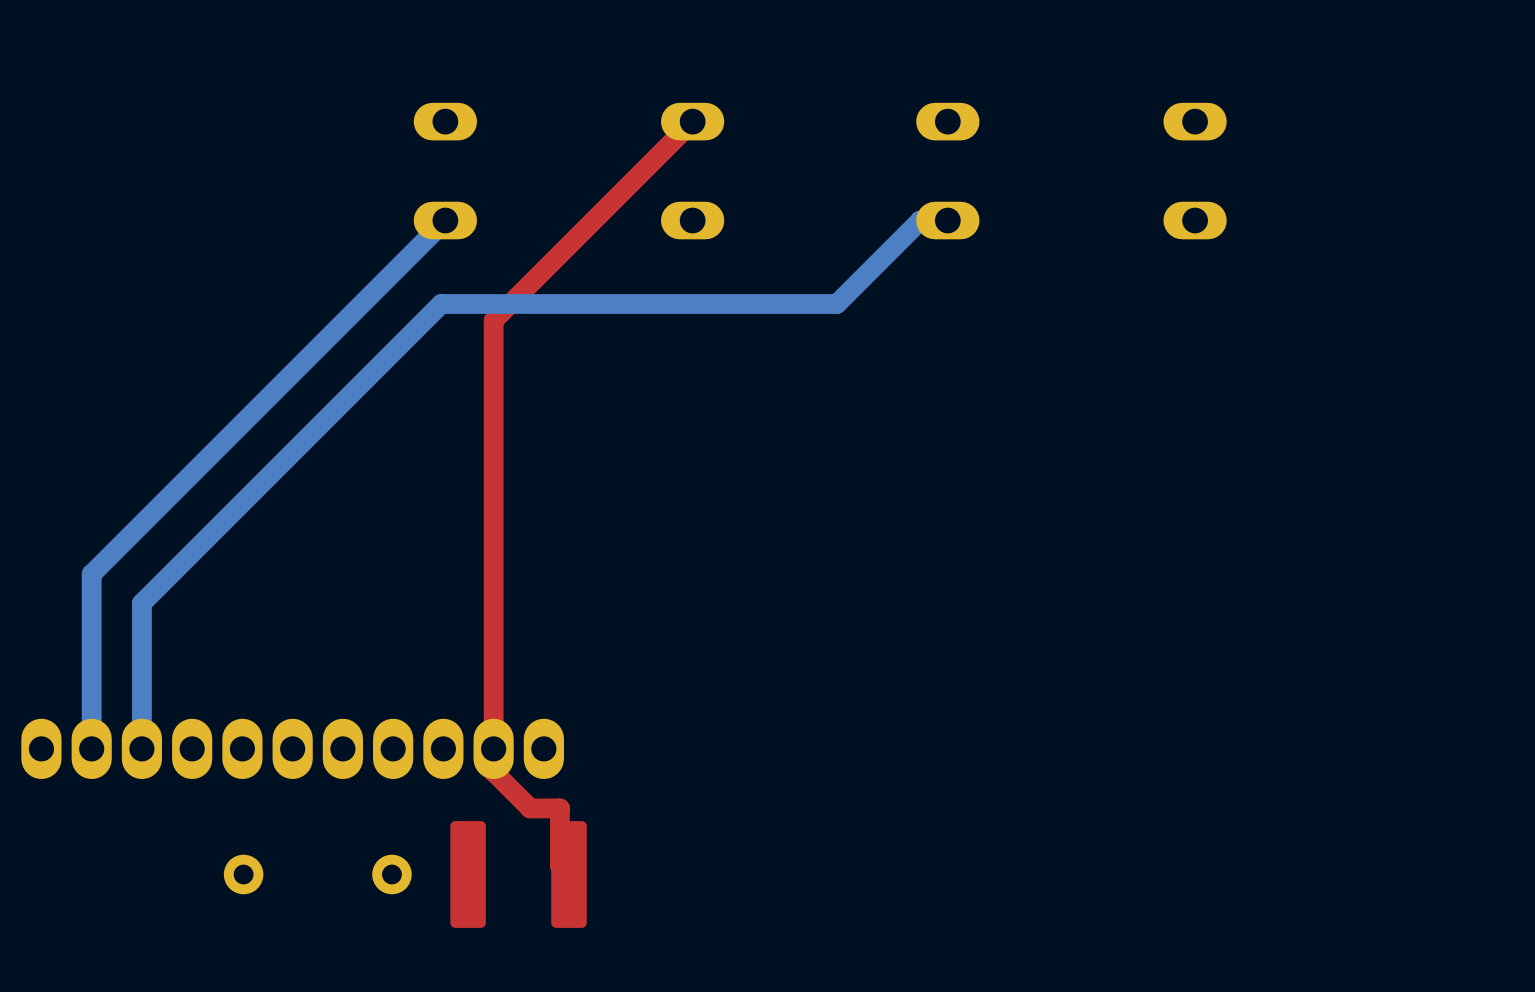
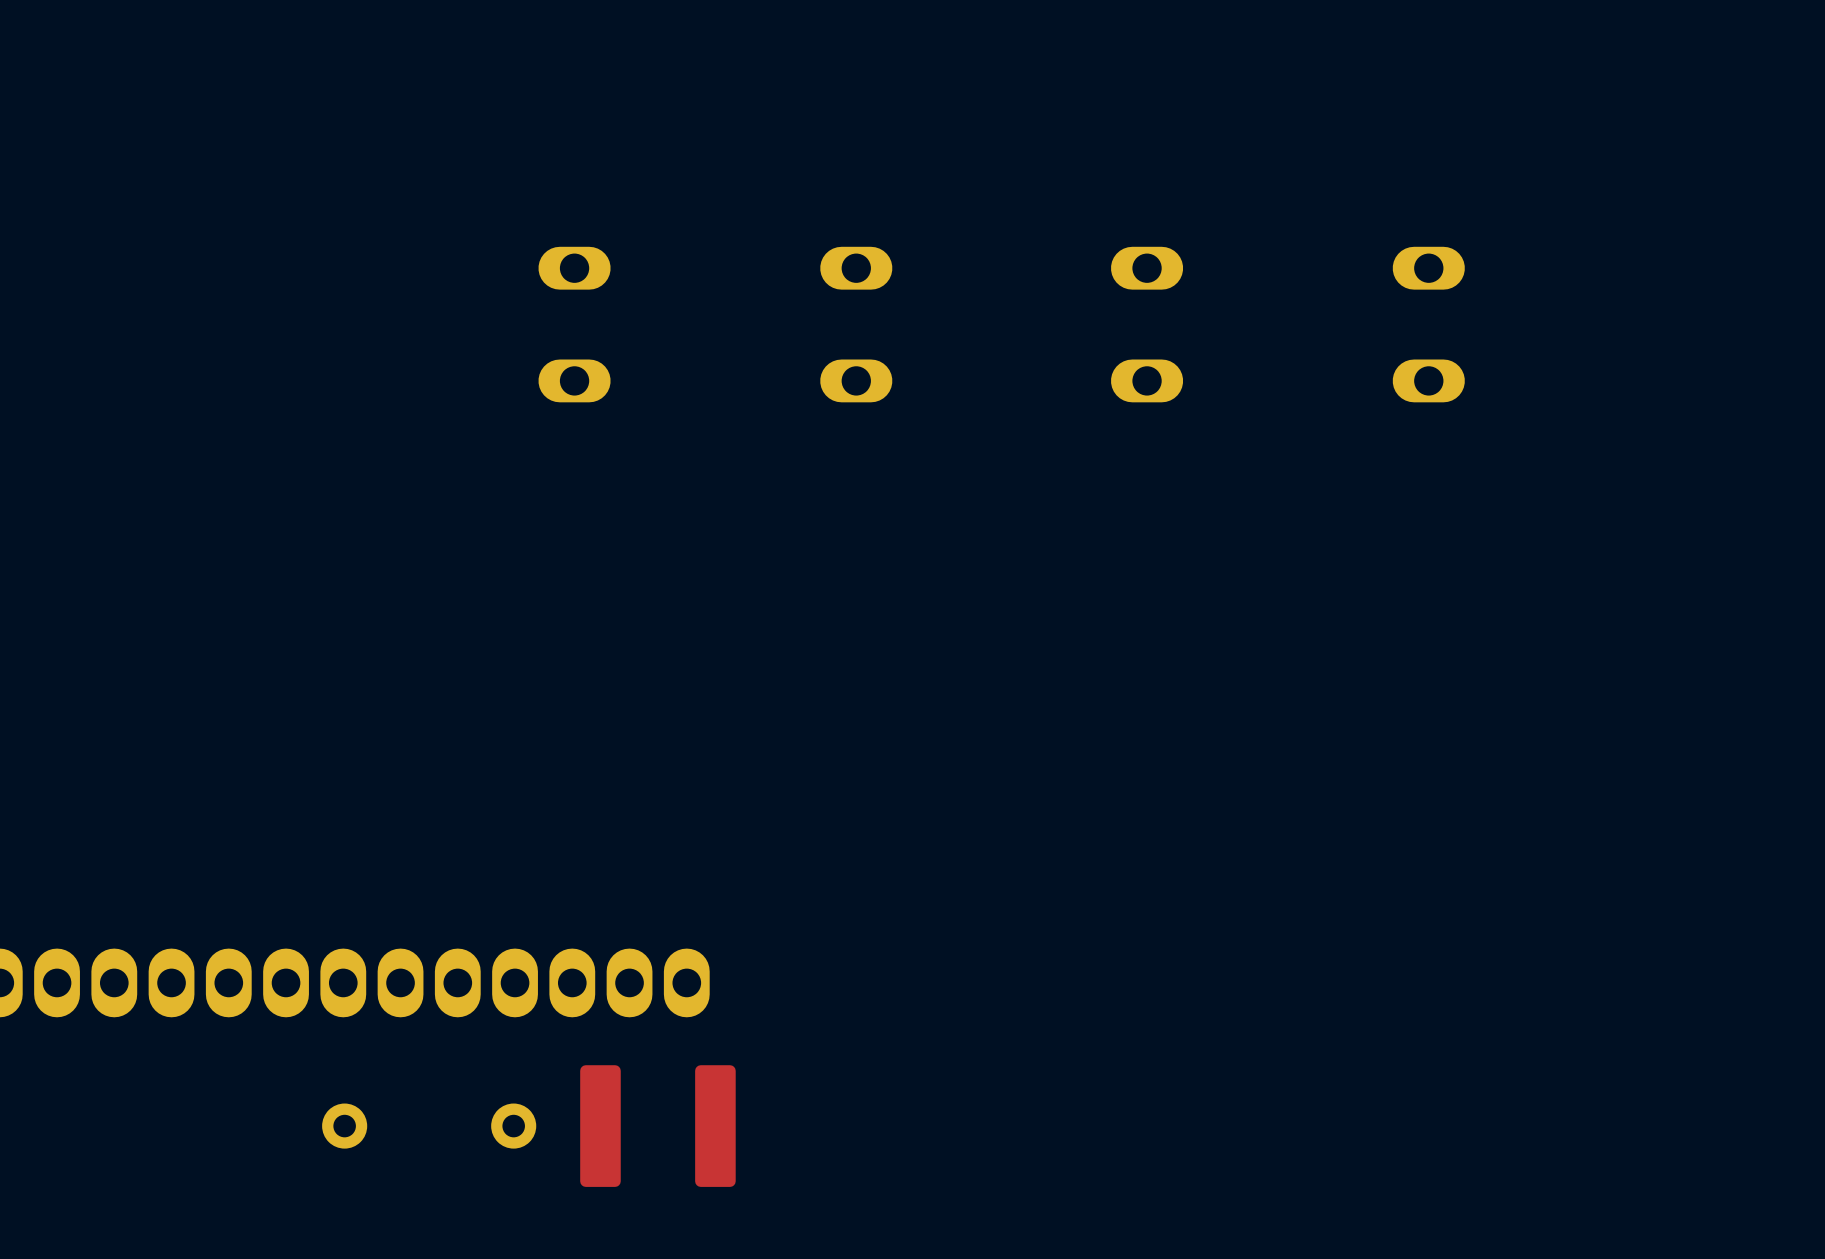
top track: (692, 121) (493, 320) (493, 771) (530, 808) (559, 808) (559, 865) (569, 874) -> none
bottom track: (445, 220) (91, 574) (91, 748) -> none
bottom track: (947, 220) (920, 220) (836, 304) (441, 304) (141, 603) (141, 748) -> none

